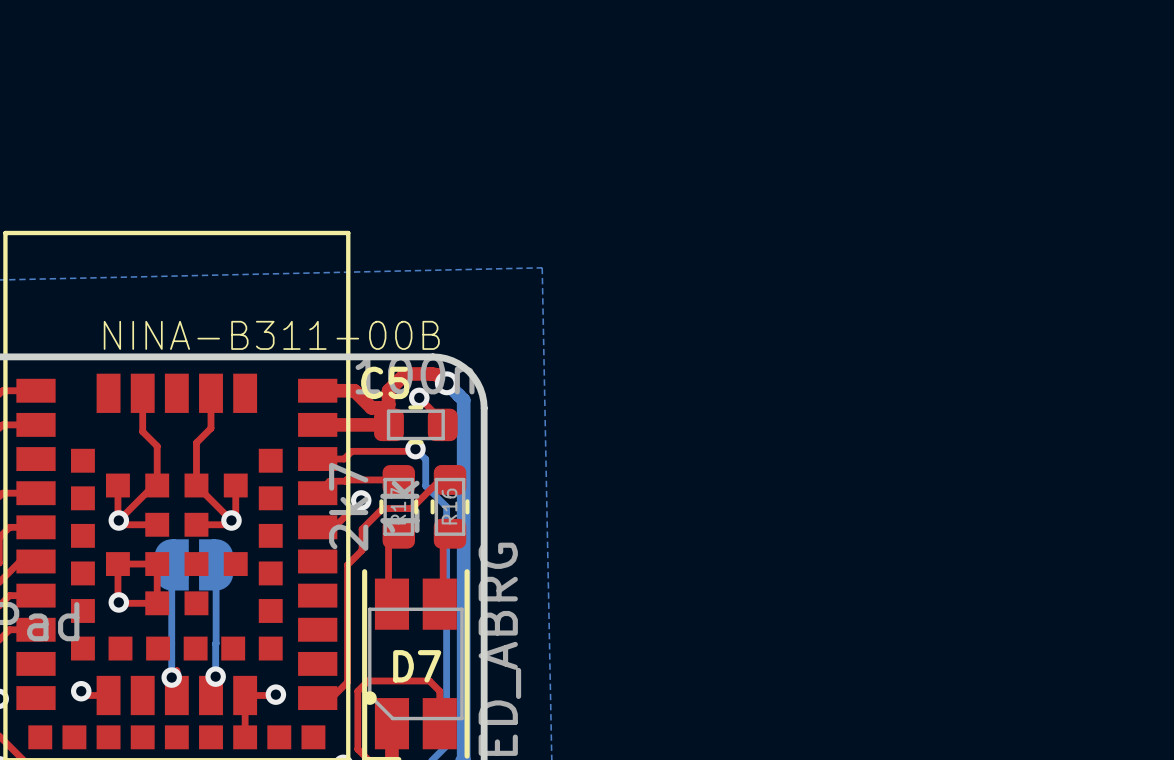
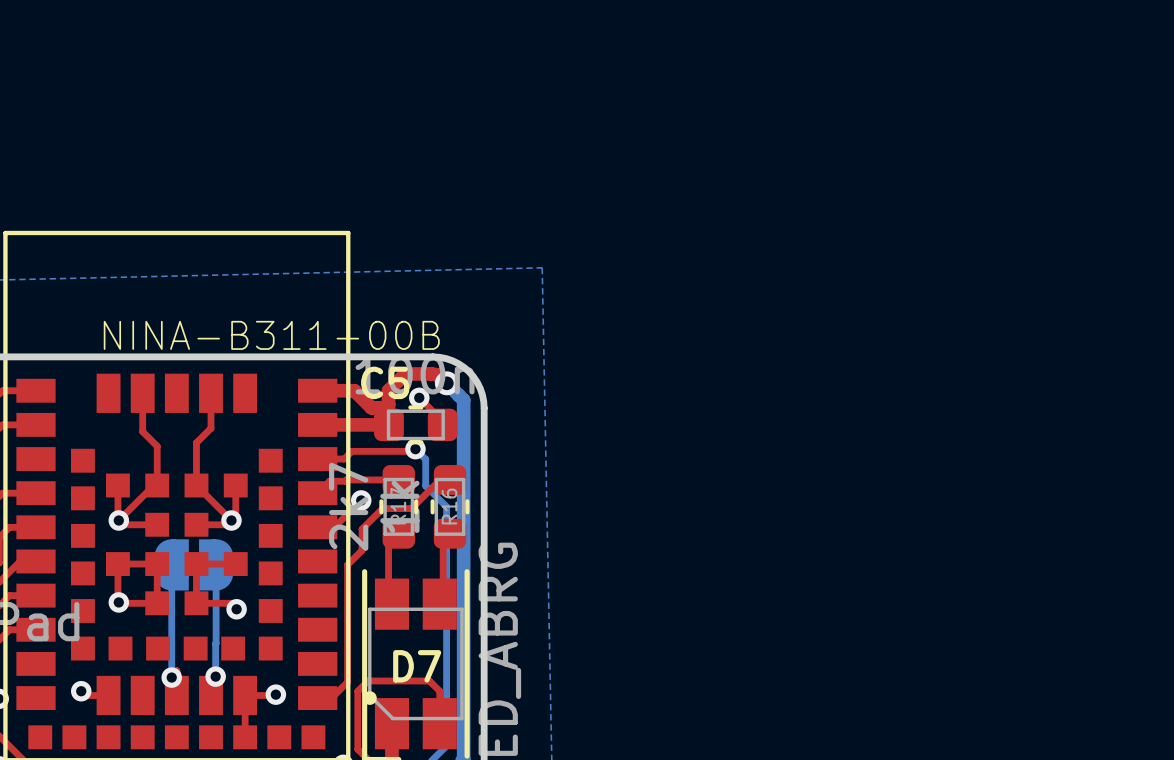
top track: none -> (235, 564) (196, 564) (196, 603) (230, 603) (236, 609)
via: none -> (236, 609)

